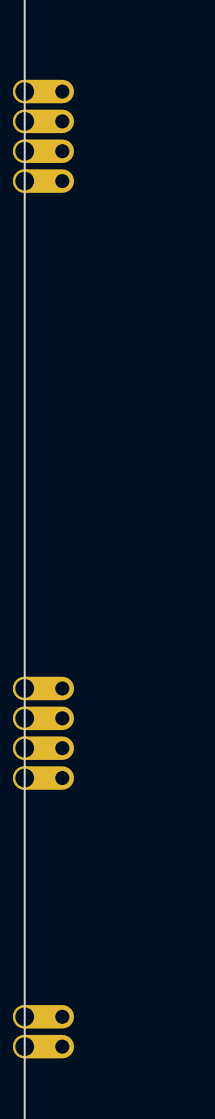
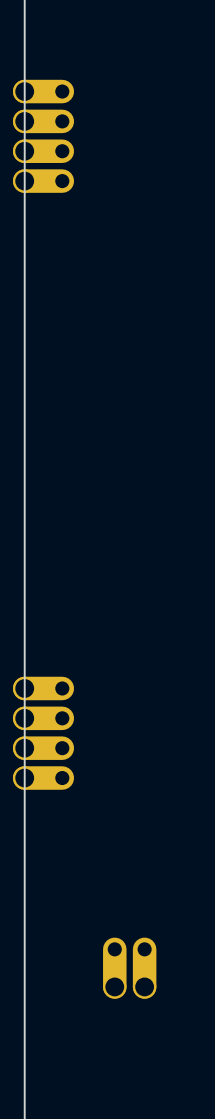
part: none -> (114, 968)
part: none -> (144, 968)
part: (43, 1016) -> none
part: (43, 1046) -> none

